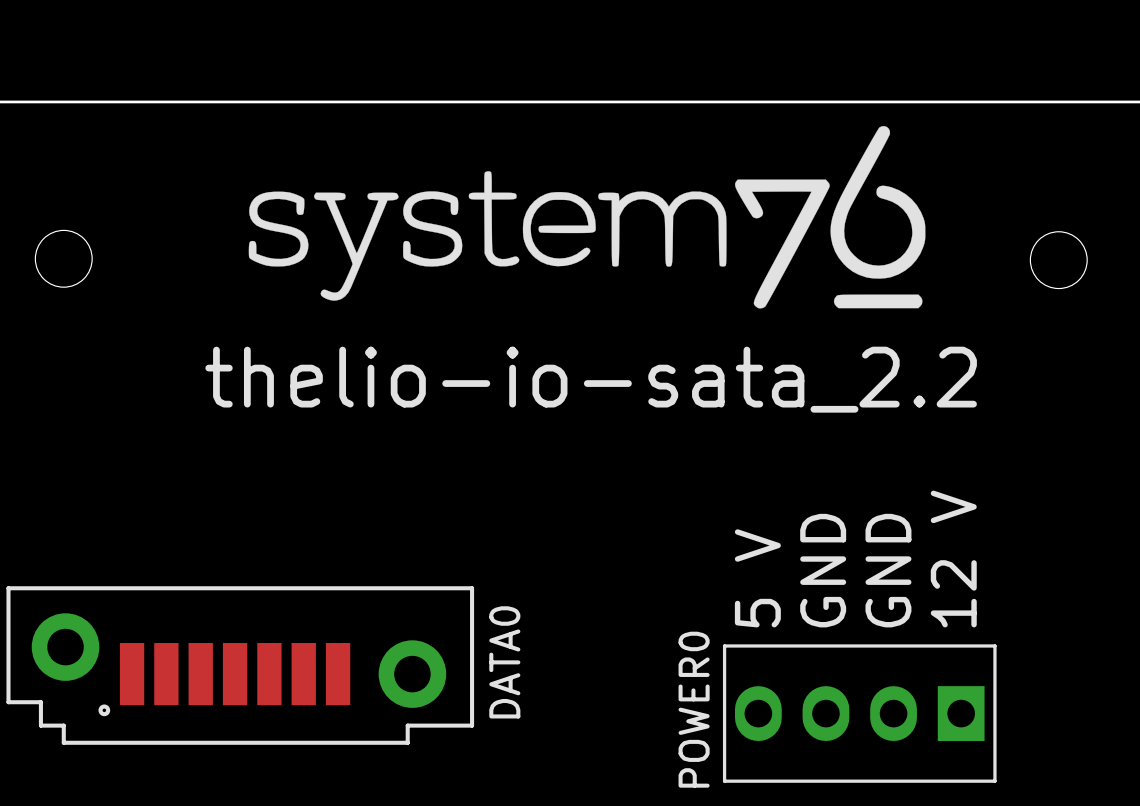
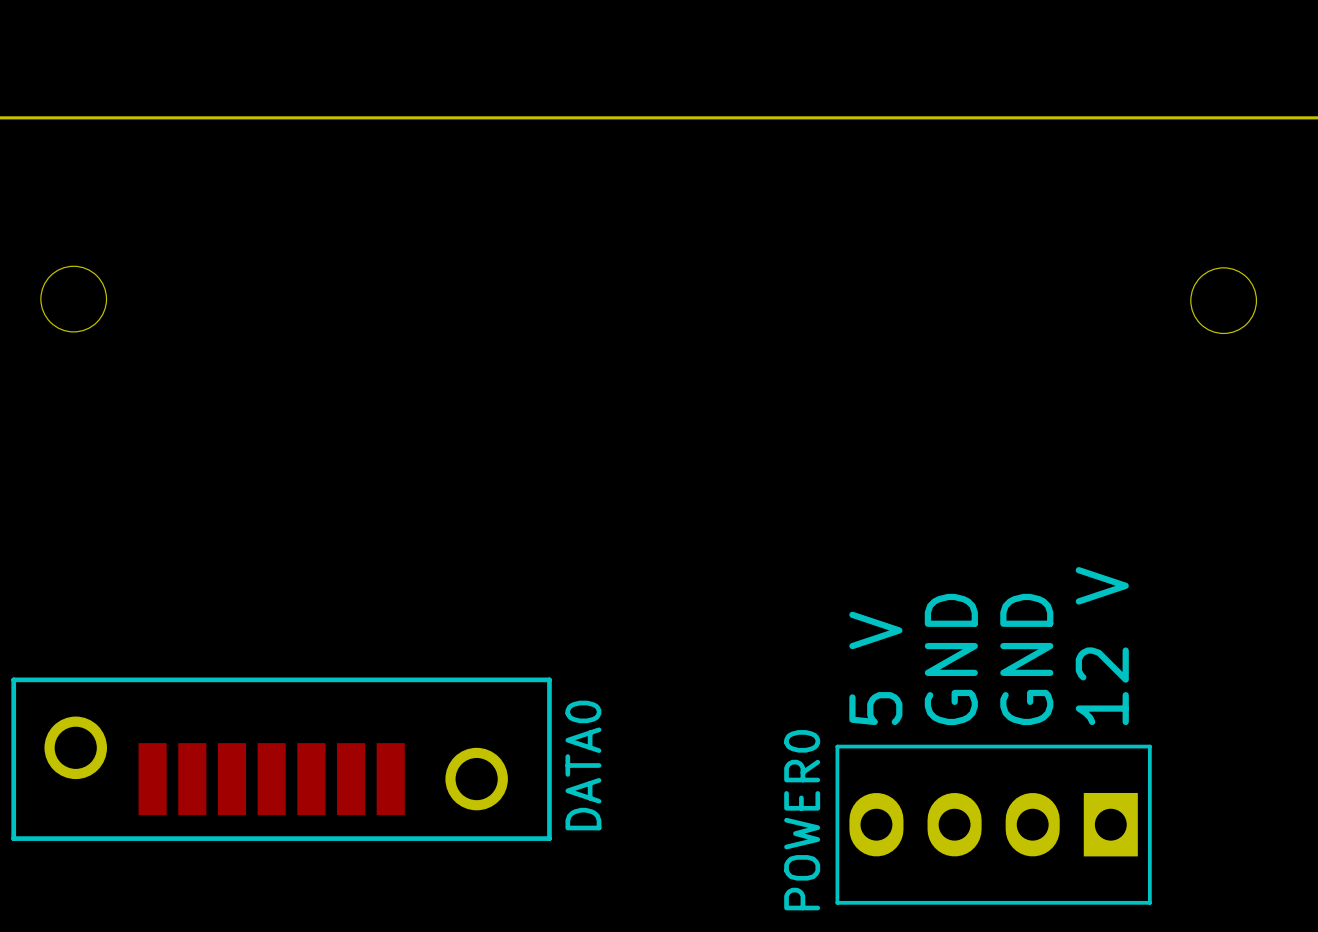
drawing: [248, 126, 926, 309] -> none
text: thelio-io-sata_2.2 (591, 379) -> none
DATA0 footprint: [6, 586, 475, 745] -> [11, 677, 552, 841]

